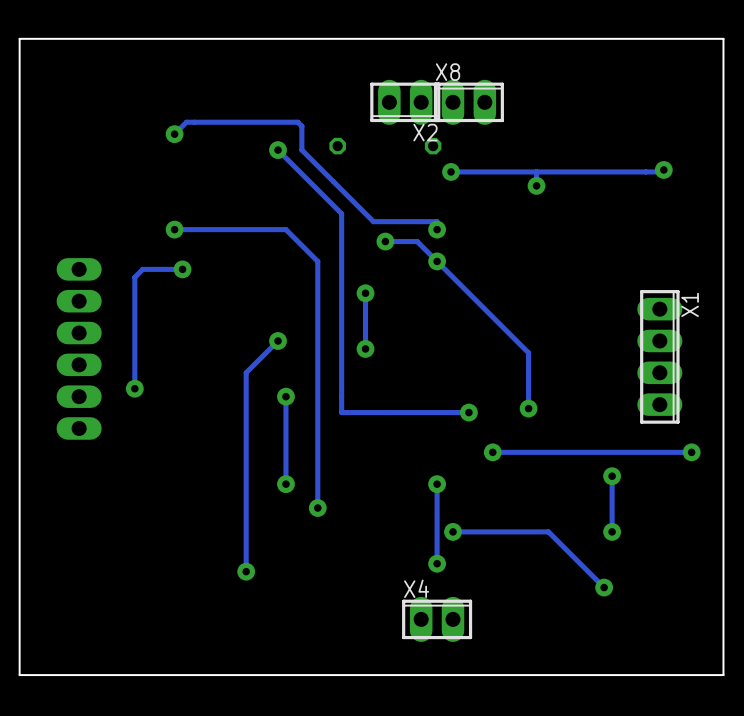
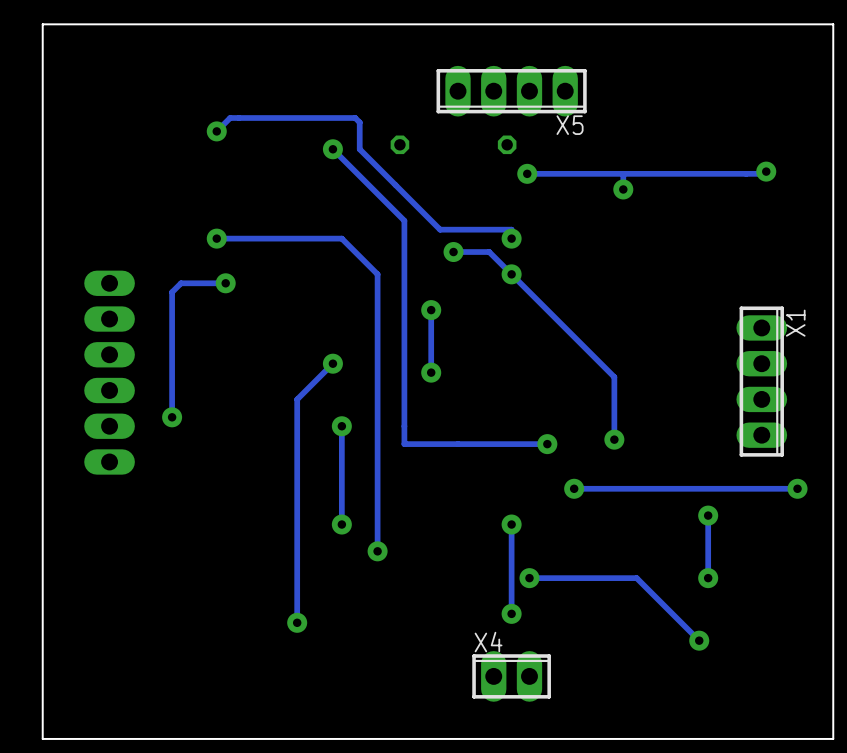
X5: none -> (511, 91)
X2: (405, 102) -> none
X8: (468, 102) -> none

